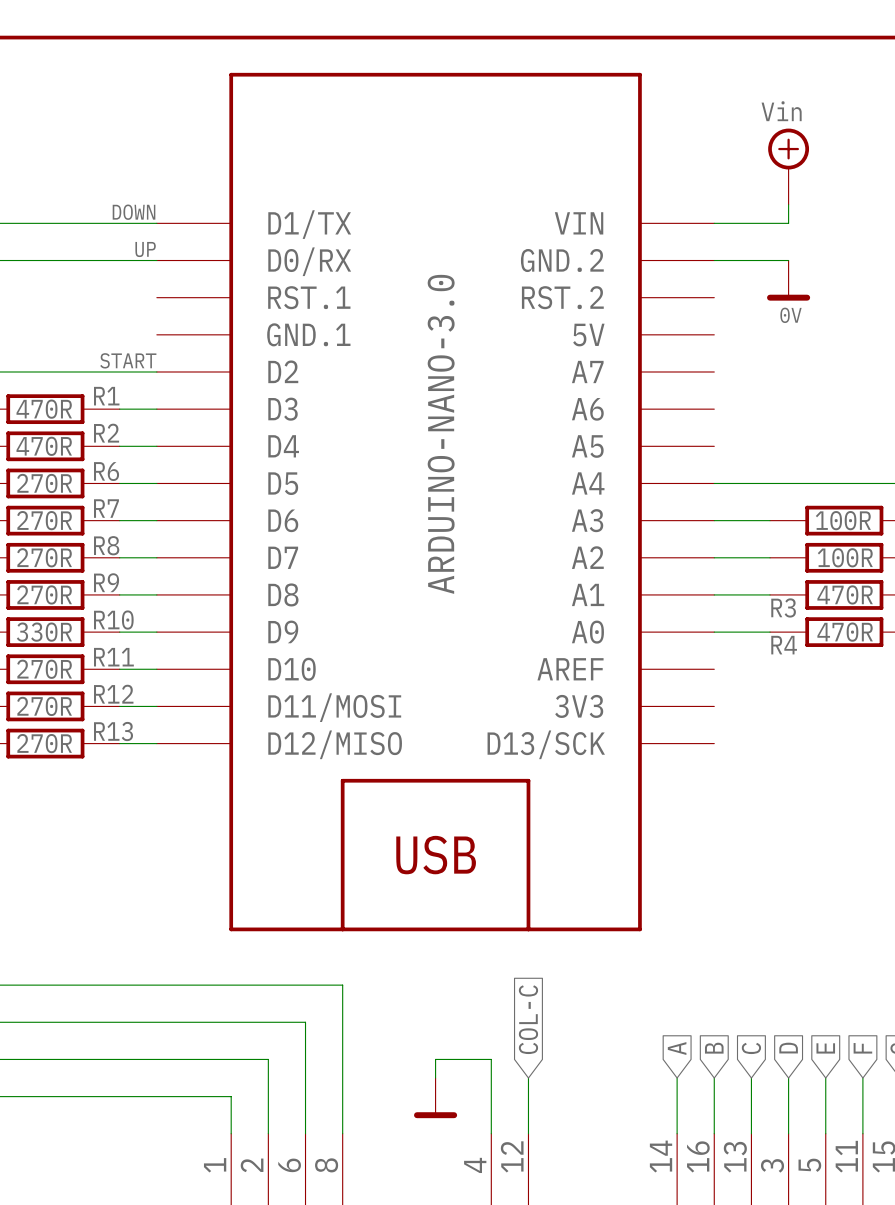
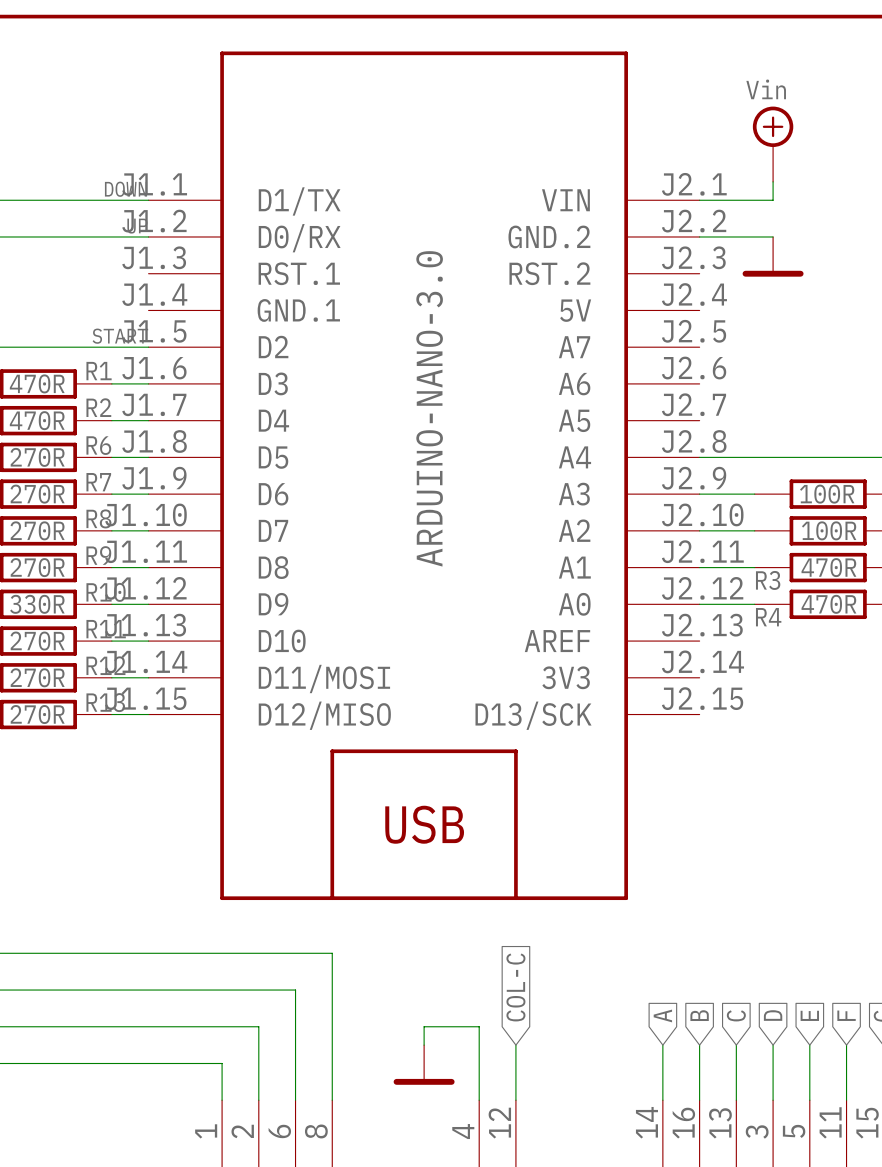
part symbol: [156, 72, 715, 932] -> [148, 51, 700, 901]
power symbol shape: [767, 260, 811, 301] -> [742, 236, 804, 277]
label: 0V (790, 315) -> none
power symbol shape: [414, 1078, 458, 1119] -> [393, 1045, 455, 1085]

